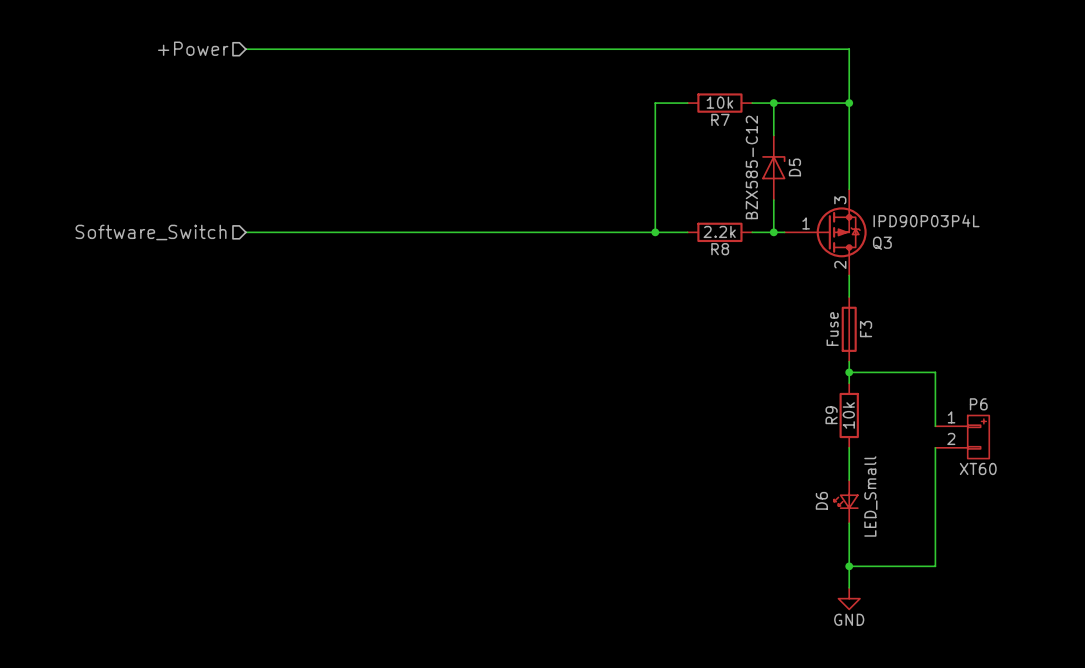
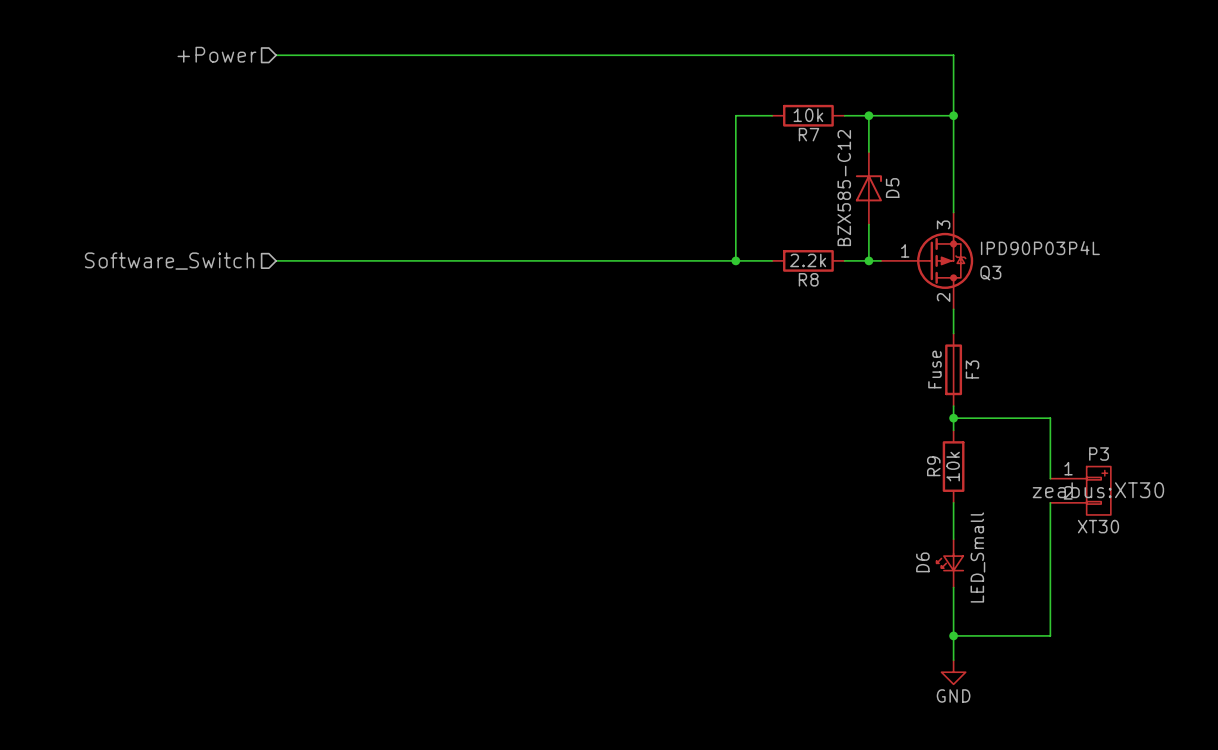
P6 name: P6 (978, 404) -> P3 (1099, 454)
P6 text: none -> zeabus:XT30 (1098, 490)
P6 value: XT60 (978, 468) -> XT30 (1098, 526)

